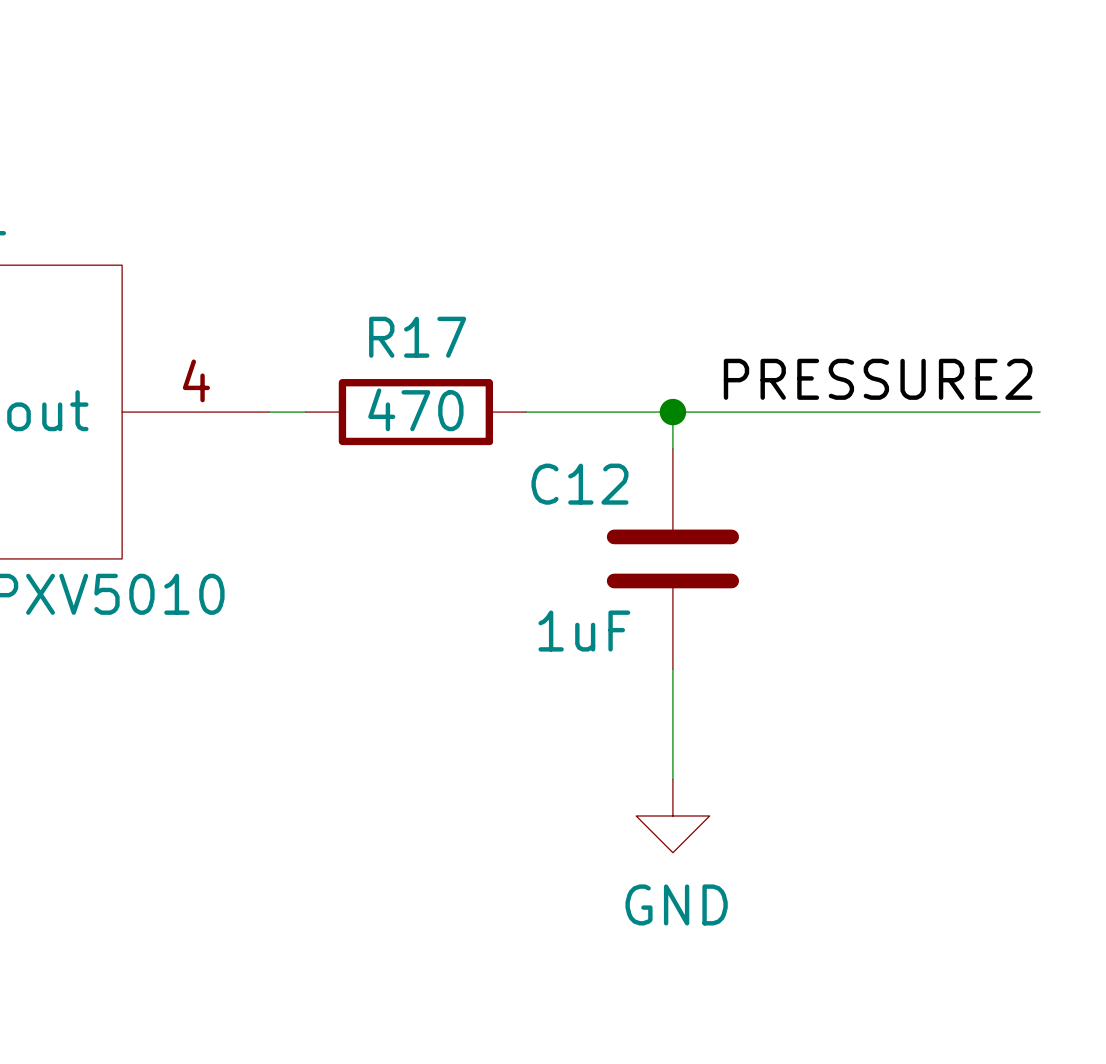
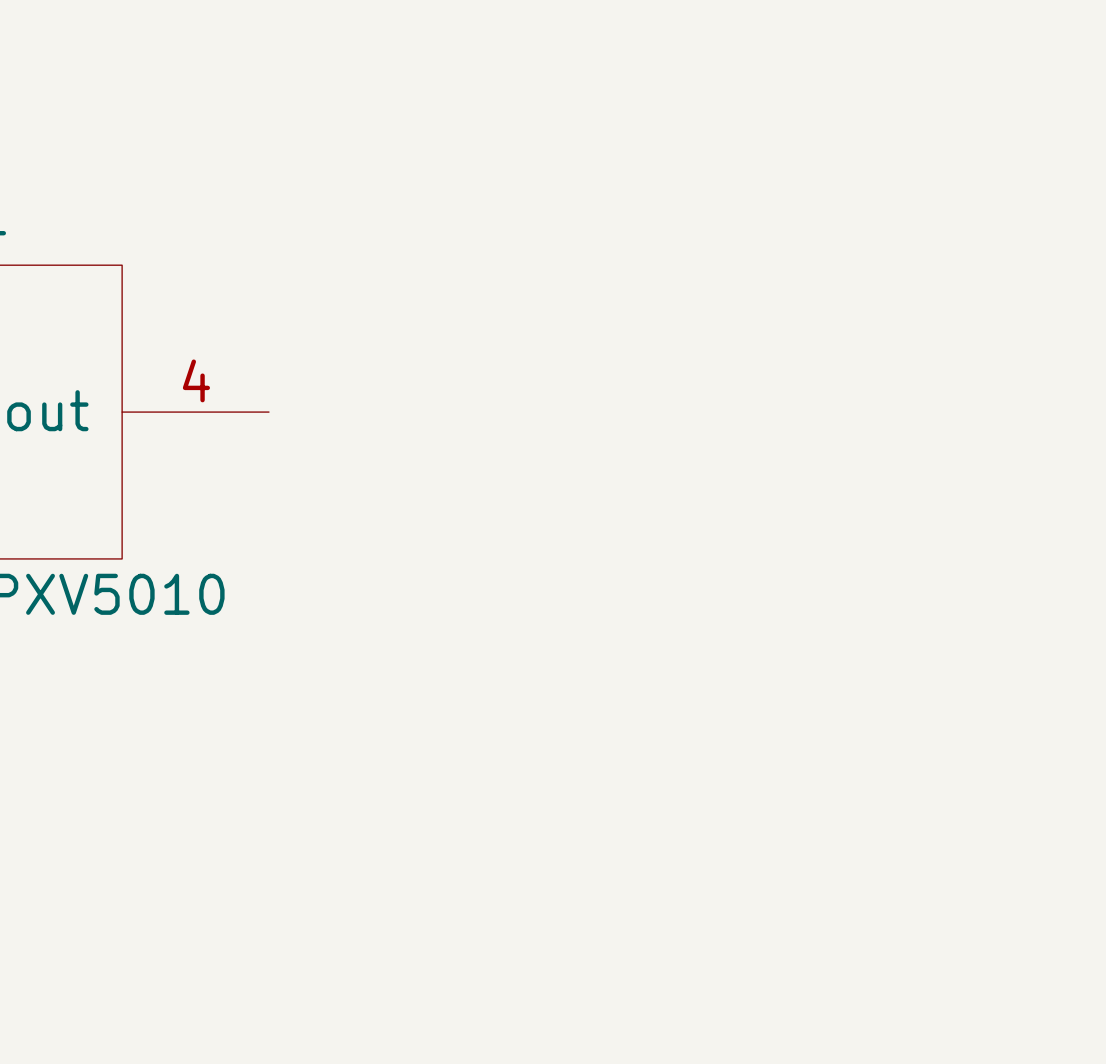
label: PRESSURE2 (878, 379) -> none
wire: (268, 412) (305, 412) -> none
R17: 470 (415, 412) -> none
wire: (526, 412) (1040, 412) -> none
wire: (672, 412) (672, 448) -> none
junction: (672, 412) -> none
C12: 1uF (672, 558) -> none
wire: (672, 669) (672, 779) -> none
power symbol: GND (672, 816) -> none

